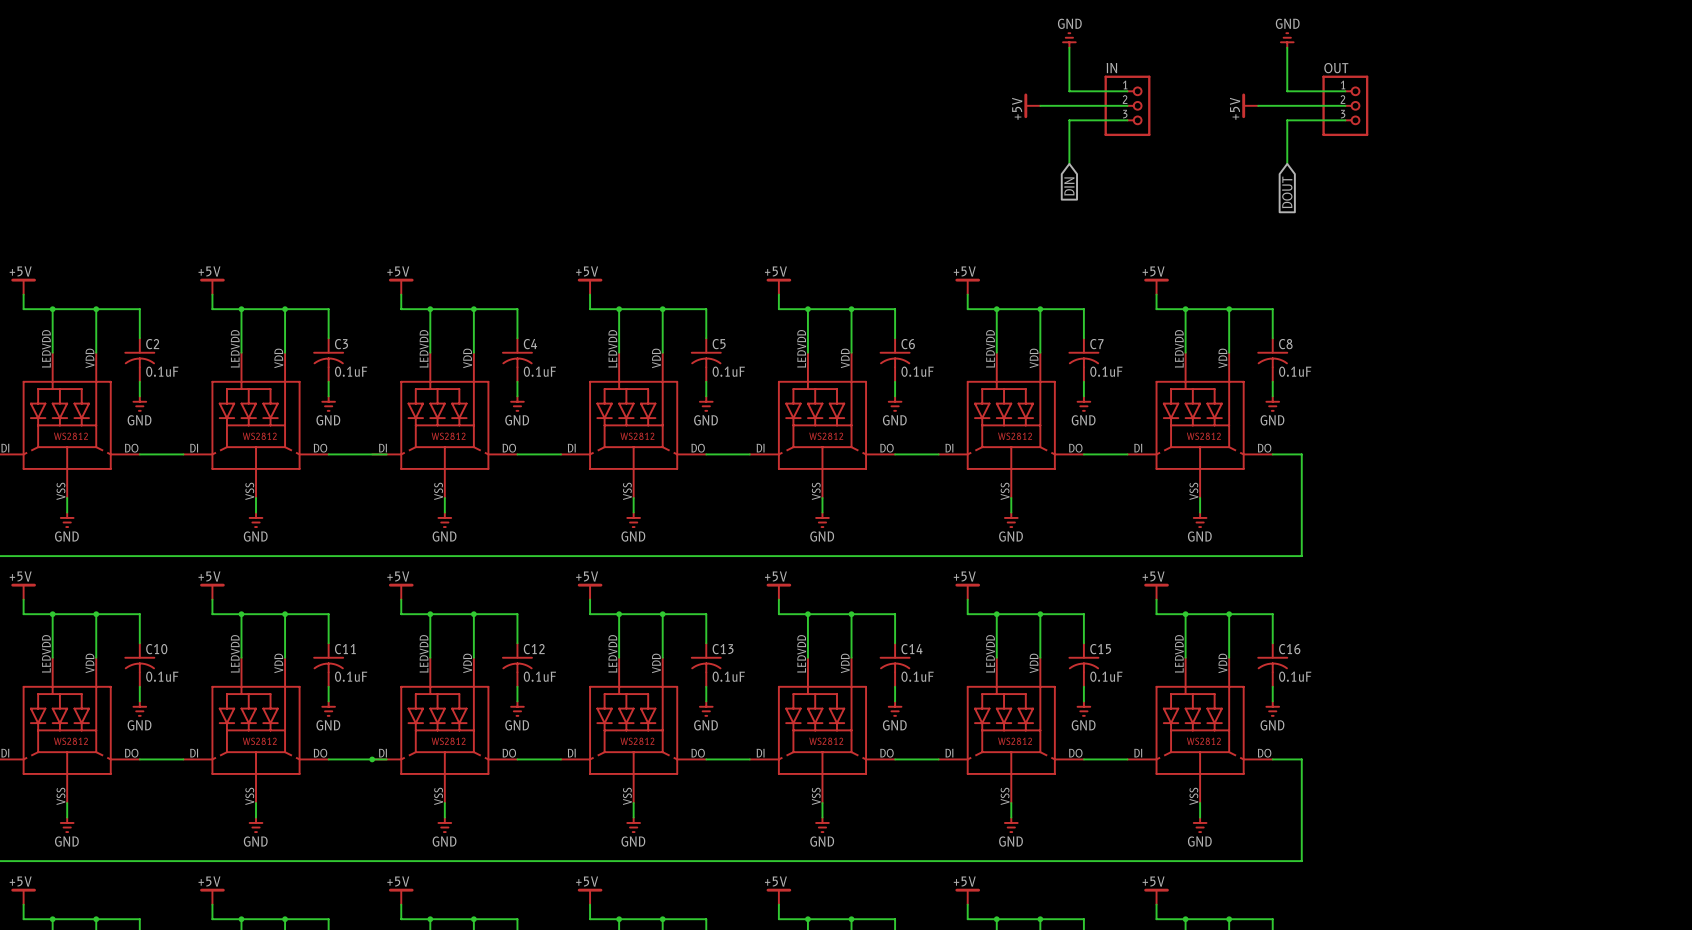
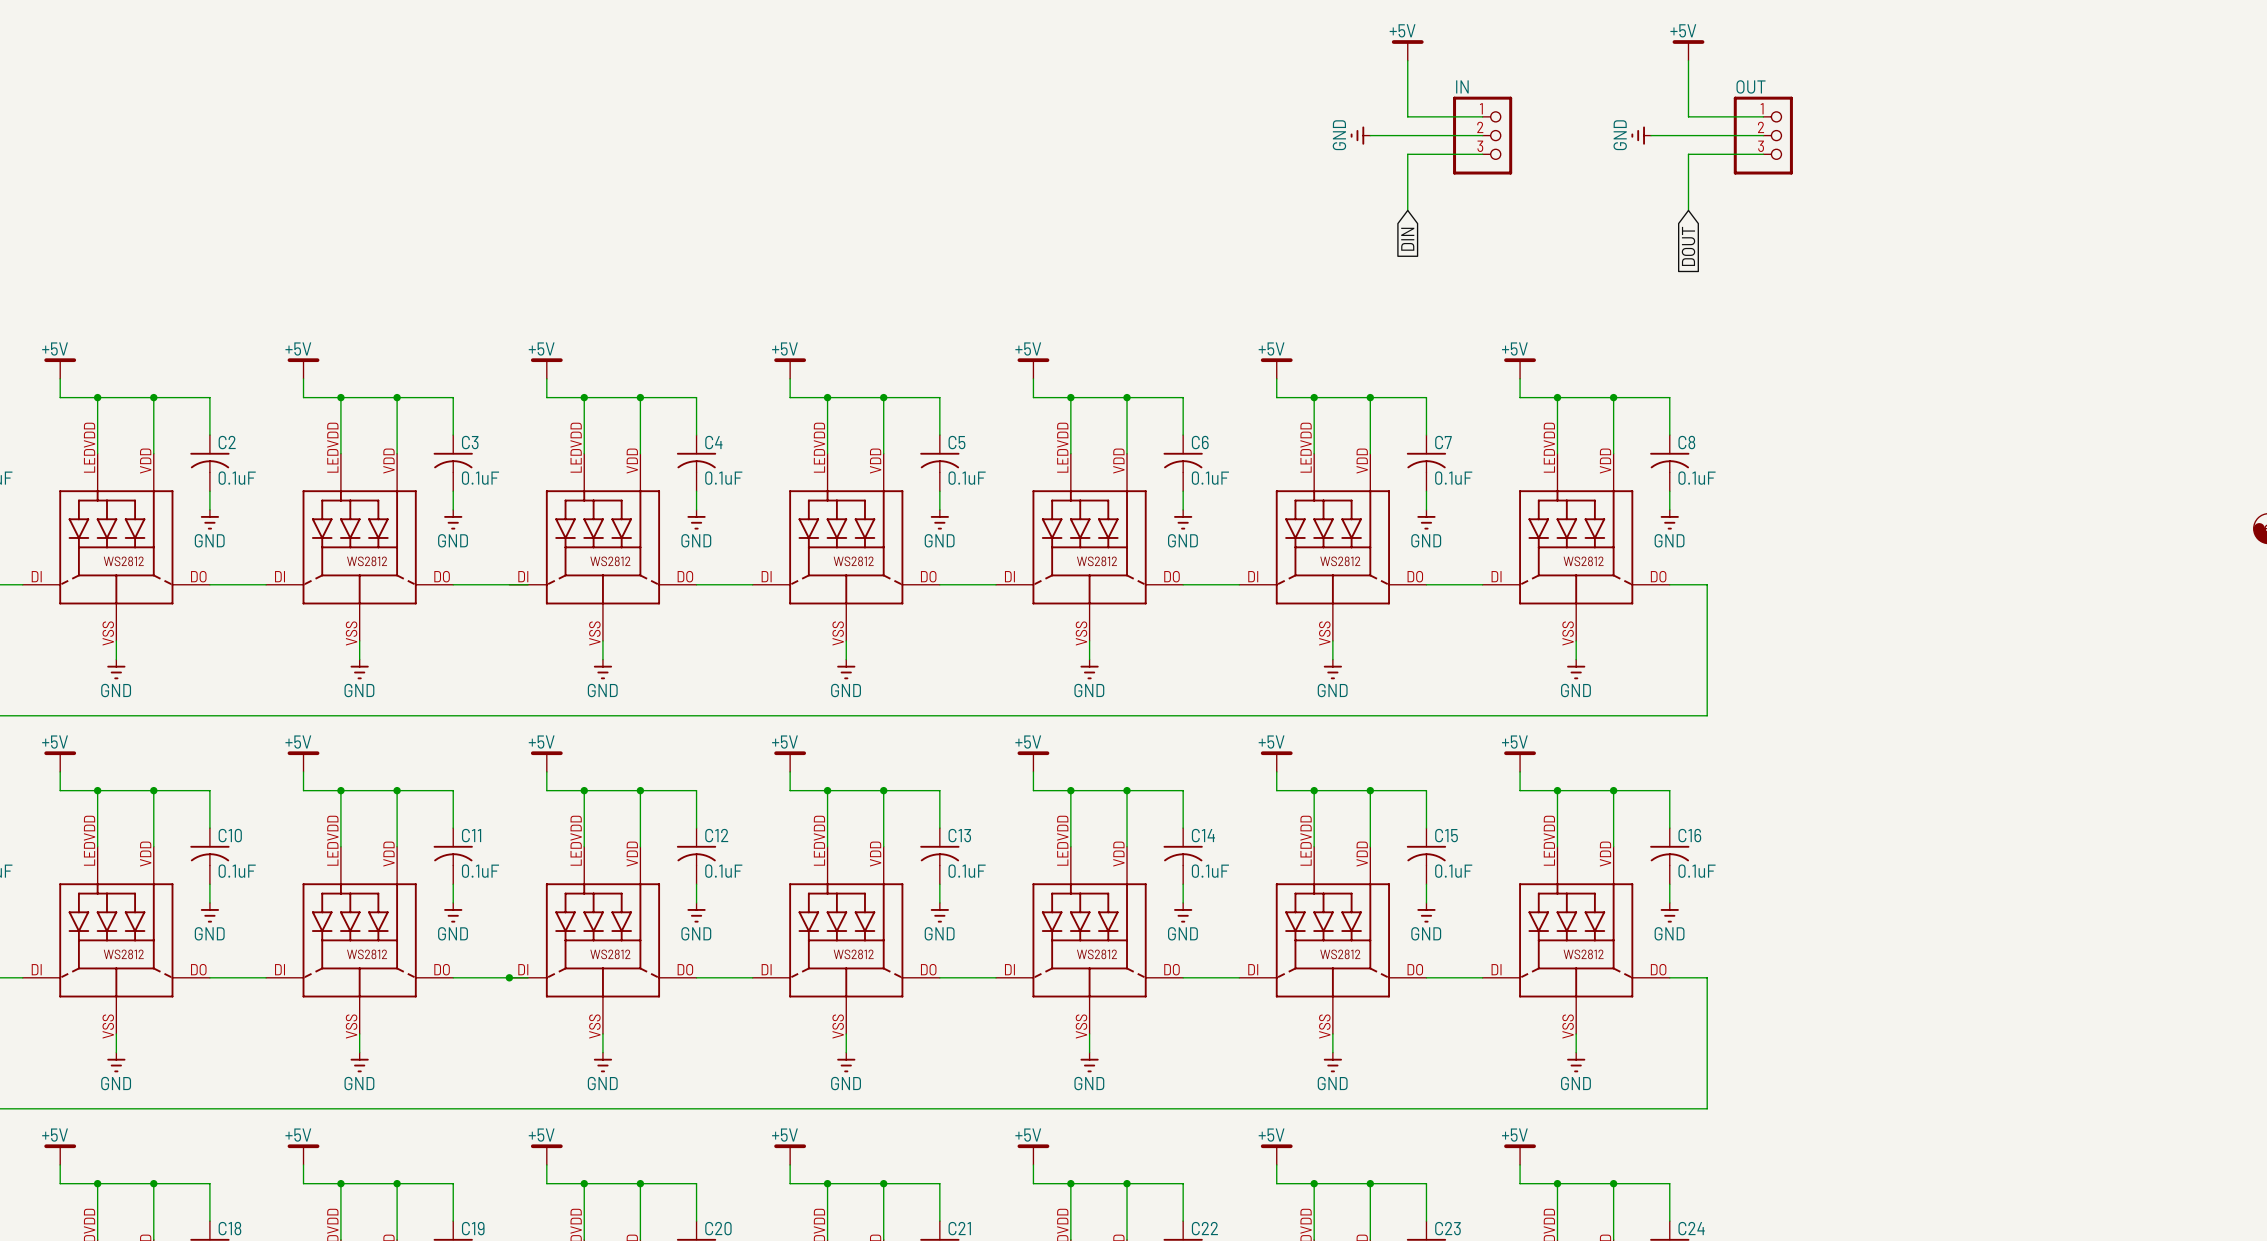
power symbol: GND (1069, 40) -> +5V (1407, 50)
power symbol: GND (1287, 40) -> +5V (1688, 50)
power symbol: +5V (1032, 105) -> GND (1360, 135)
power symbol: +5V (1250, 105) -> GND (1641, 135)

